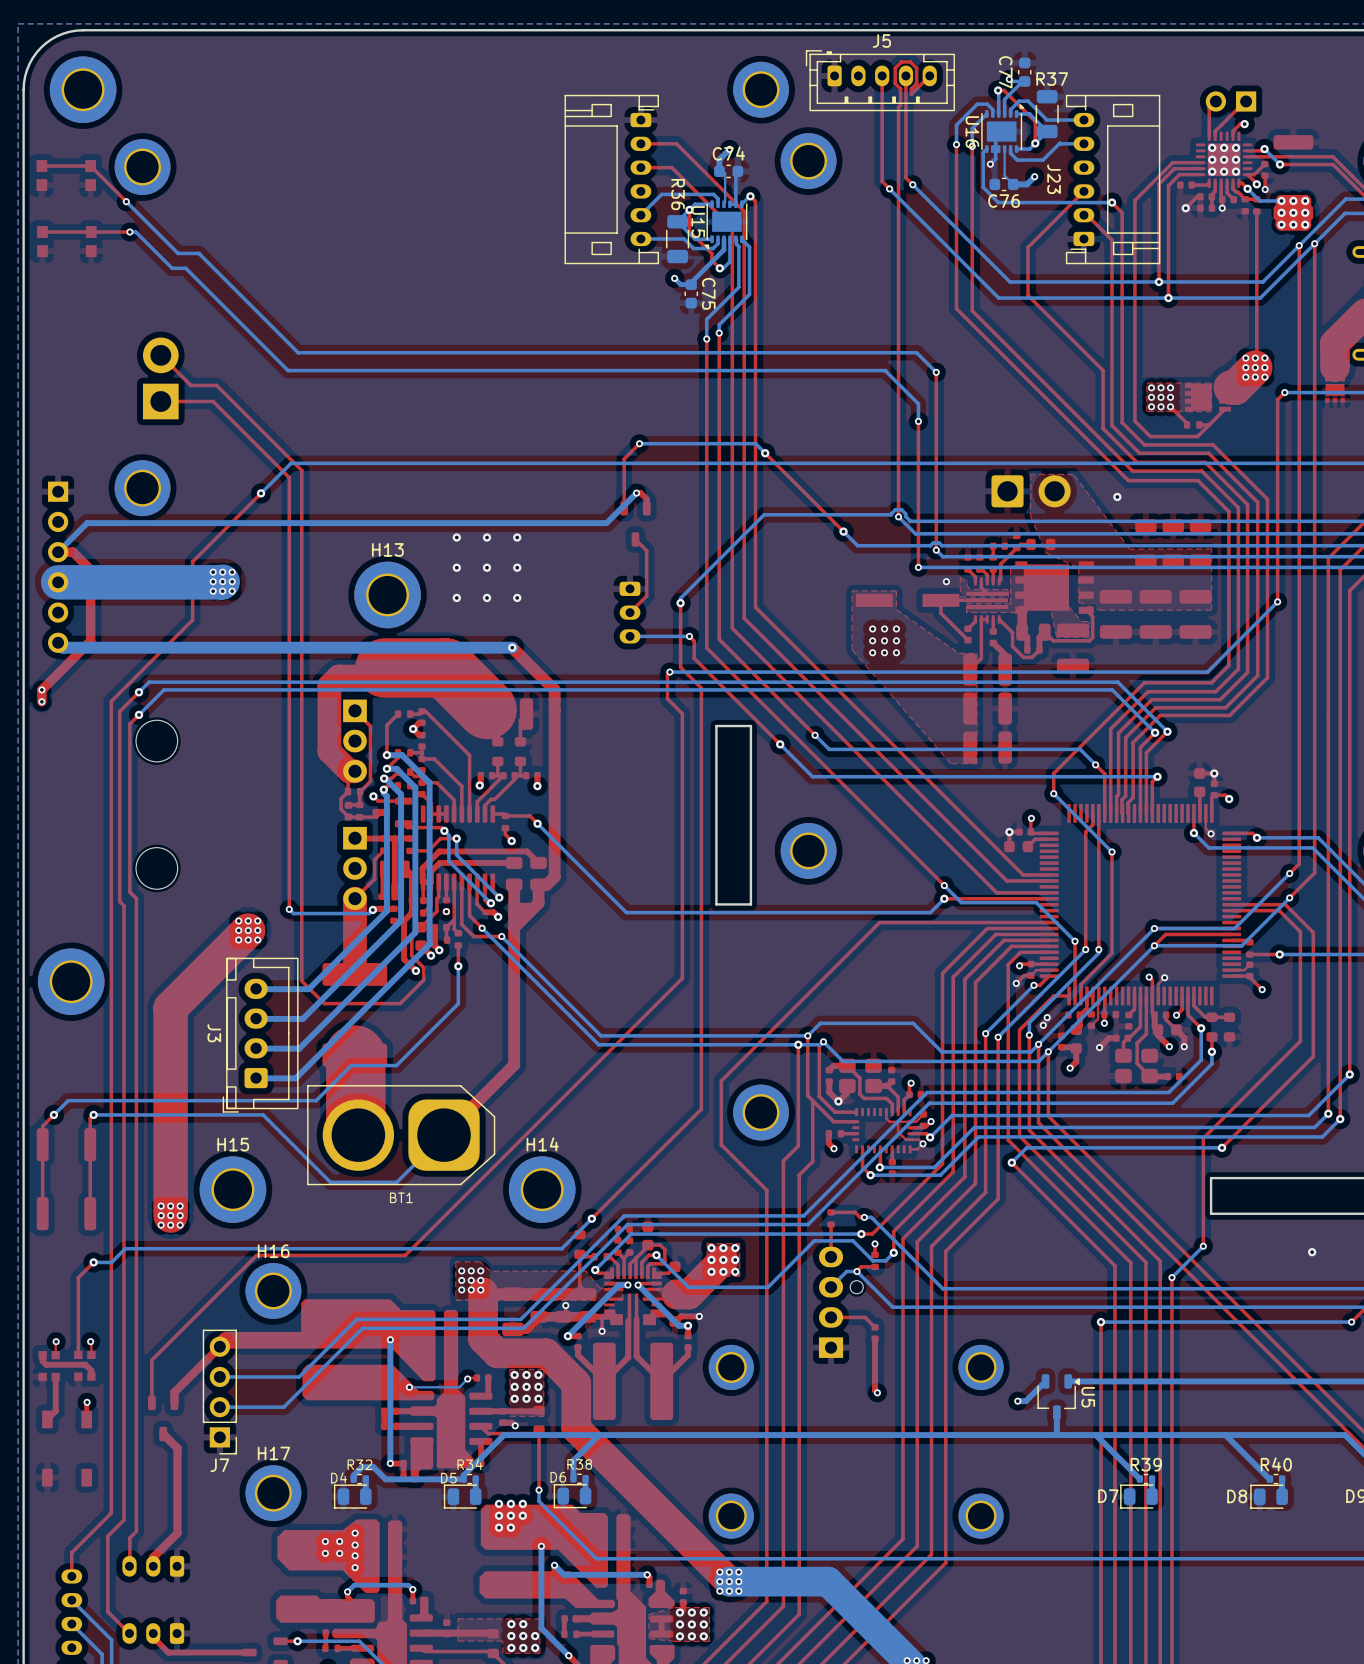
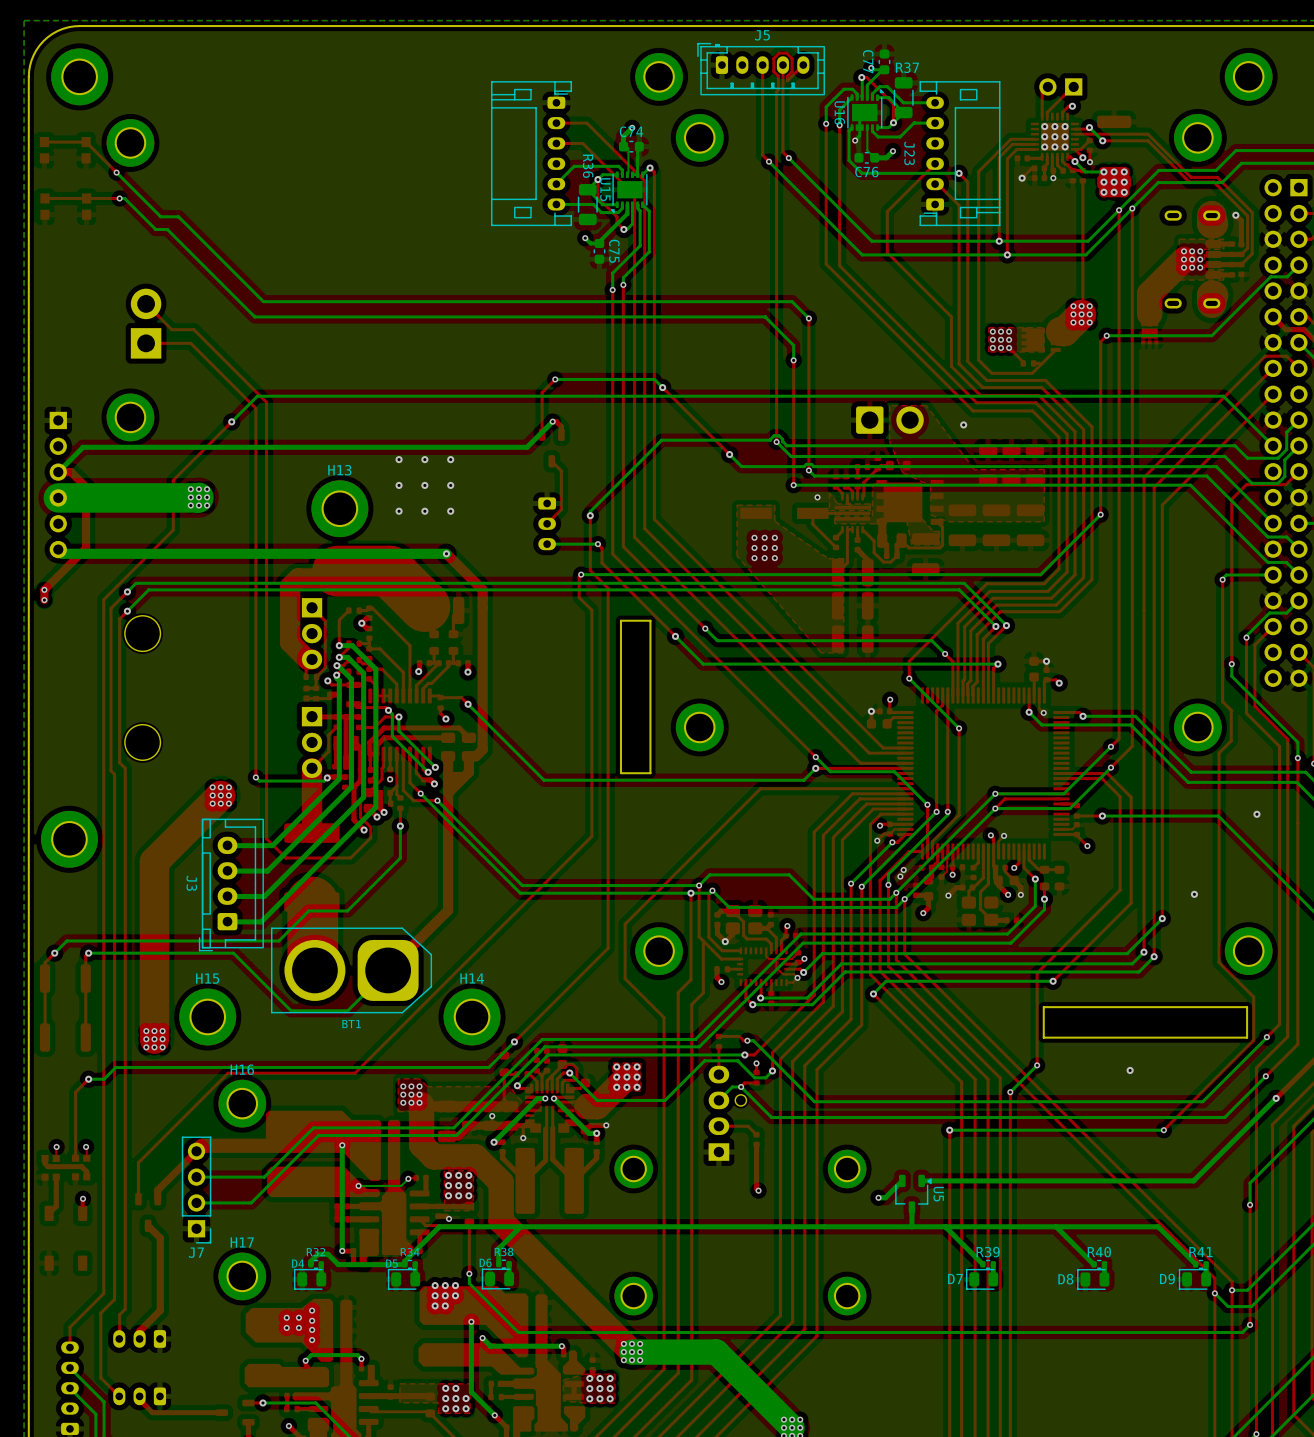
top track: (348, 791) (341, 798) (341, 809) (348, 816) -> none

